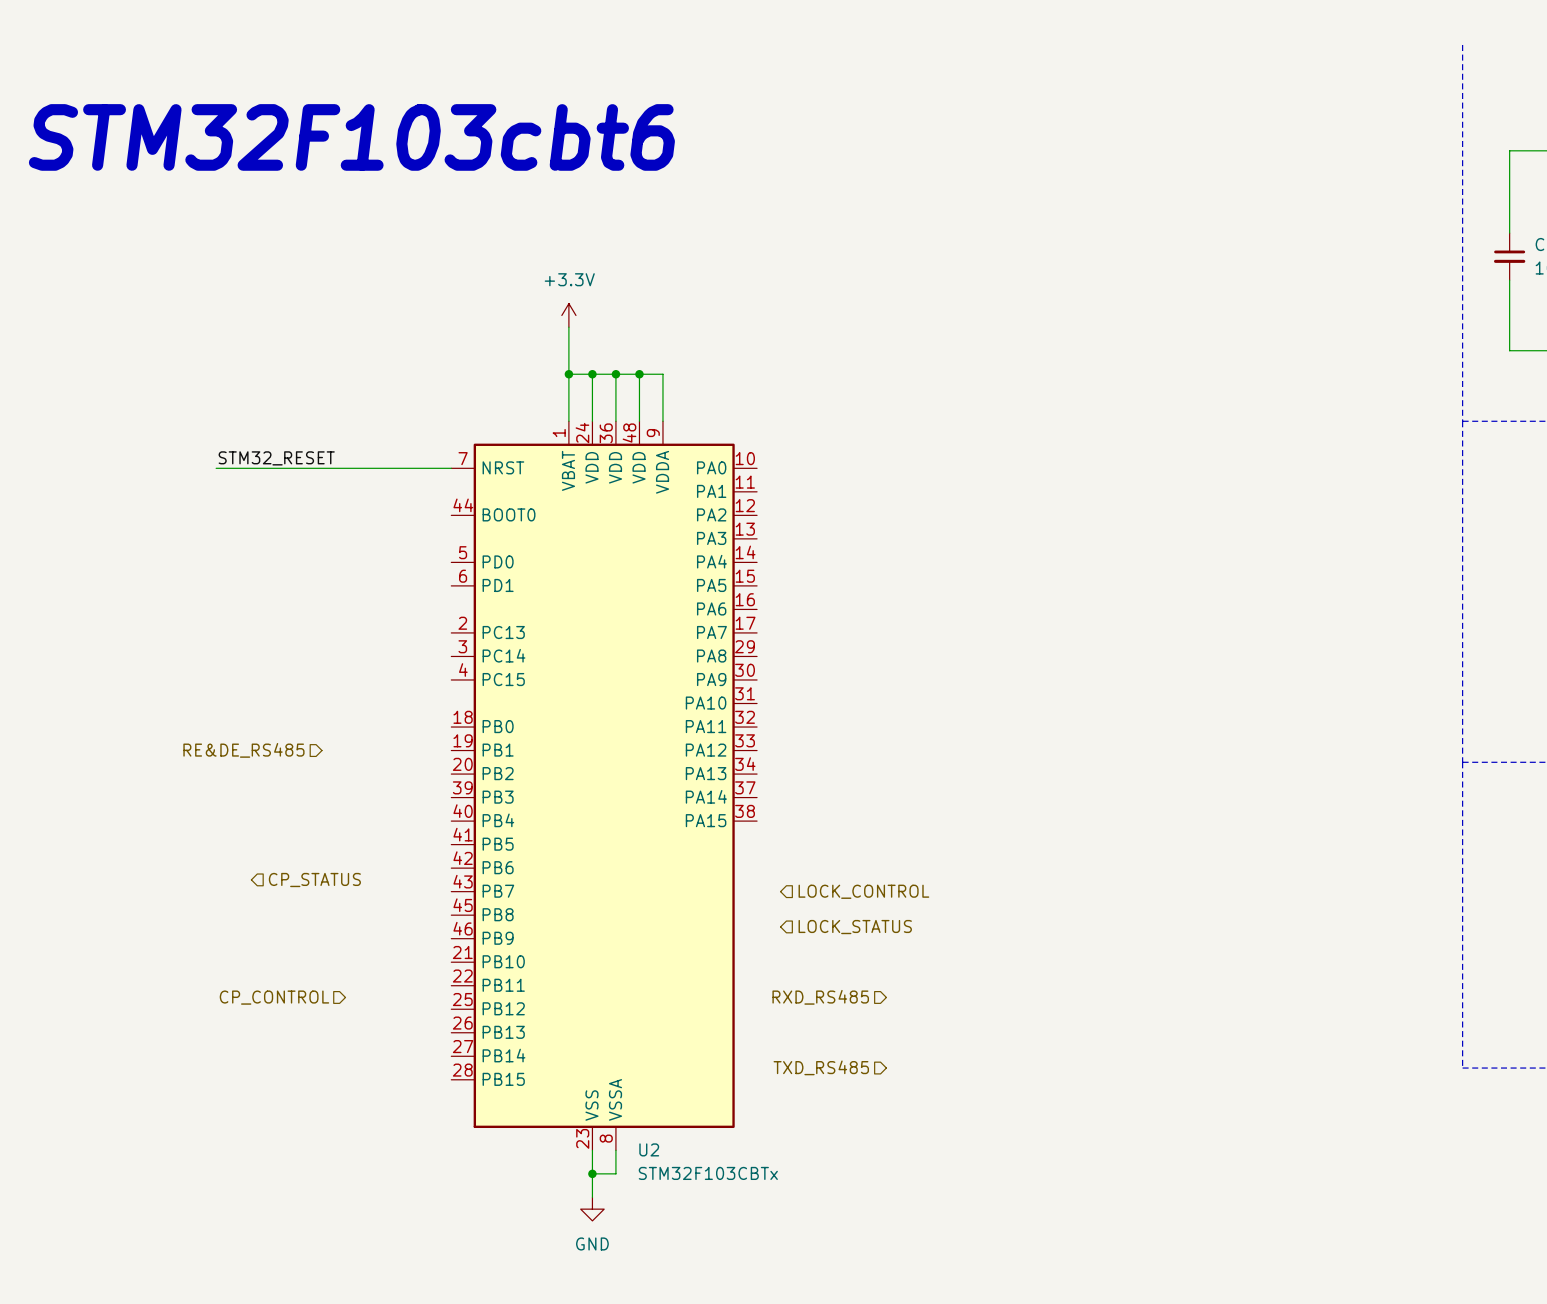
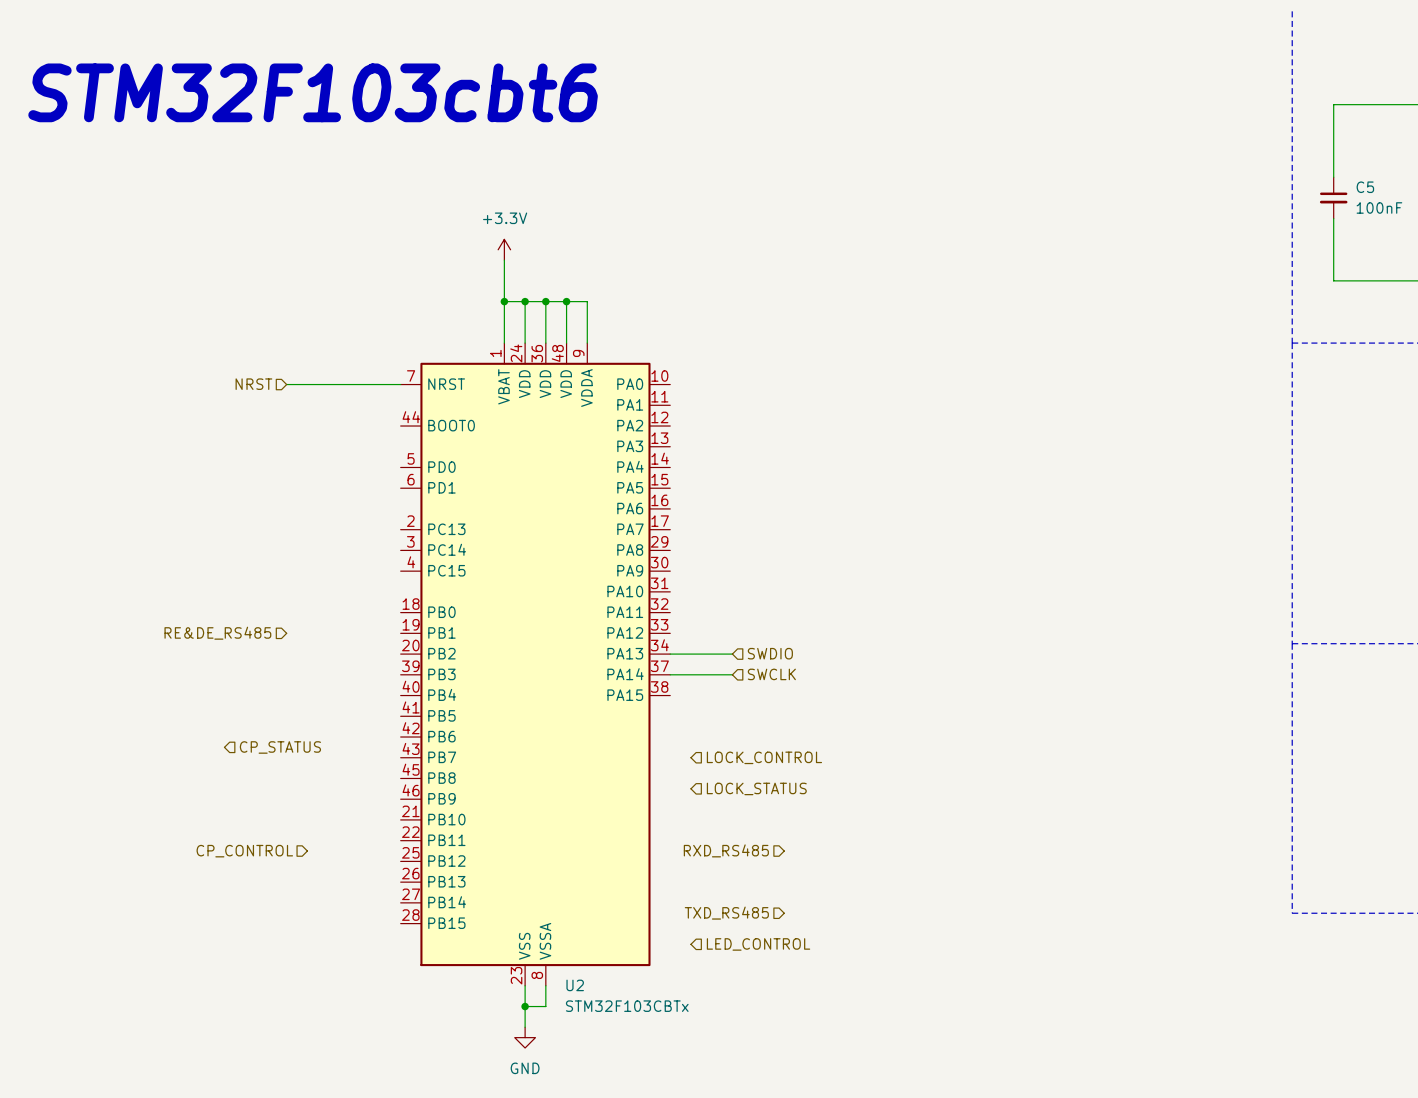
label: STM32_RESET (276, 458) -> none
hierarchical label: none -> NRST (253, 384)
wire: (216, 468) (321, 468) -> none
hierarchical label: none -> SWDIO (770, 653)
wire: none -> (670, 654) (732, 654)
wire: none -> (670, 674) (732, 674)
hierarchical label: none -> SWCLK (771, 674)
hierarchical label: none -> LED_CONTROL (758, 944)

